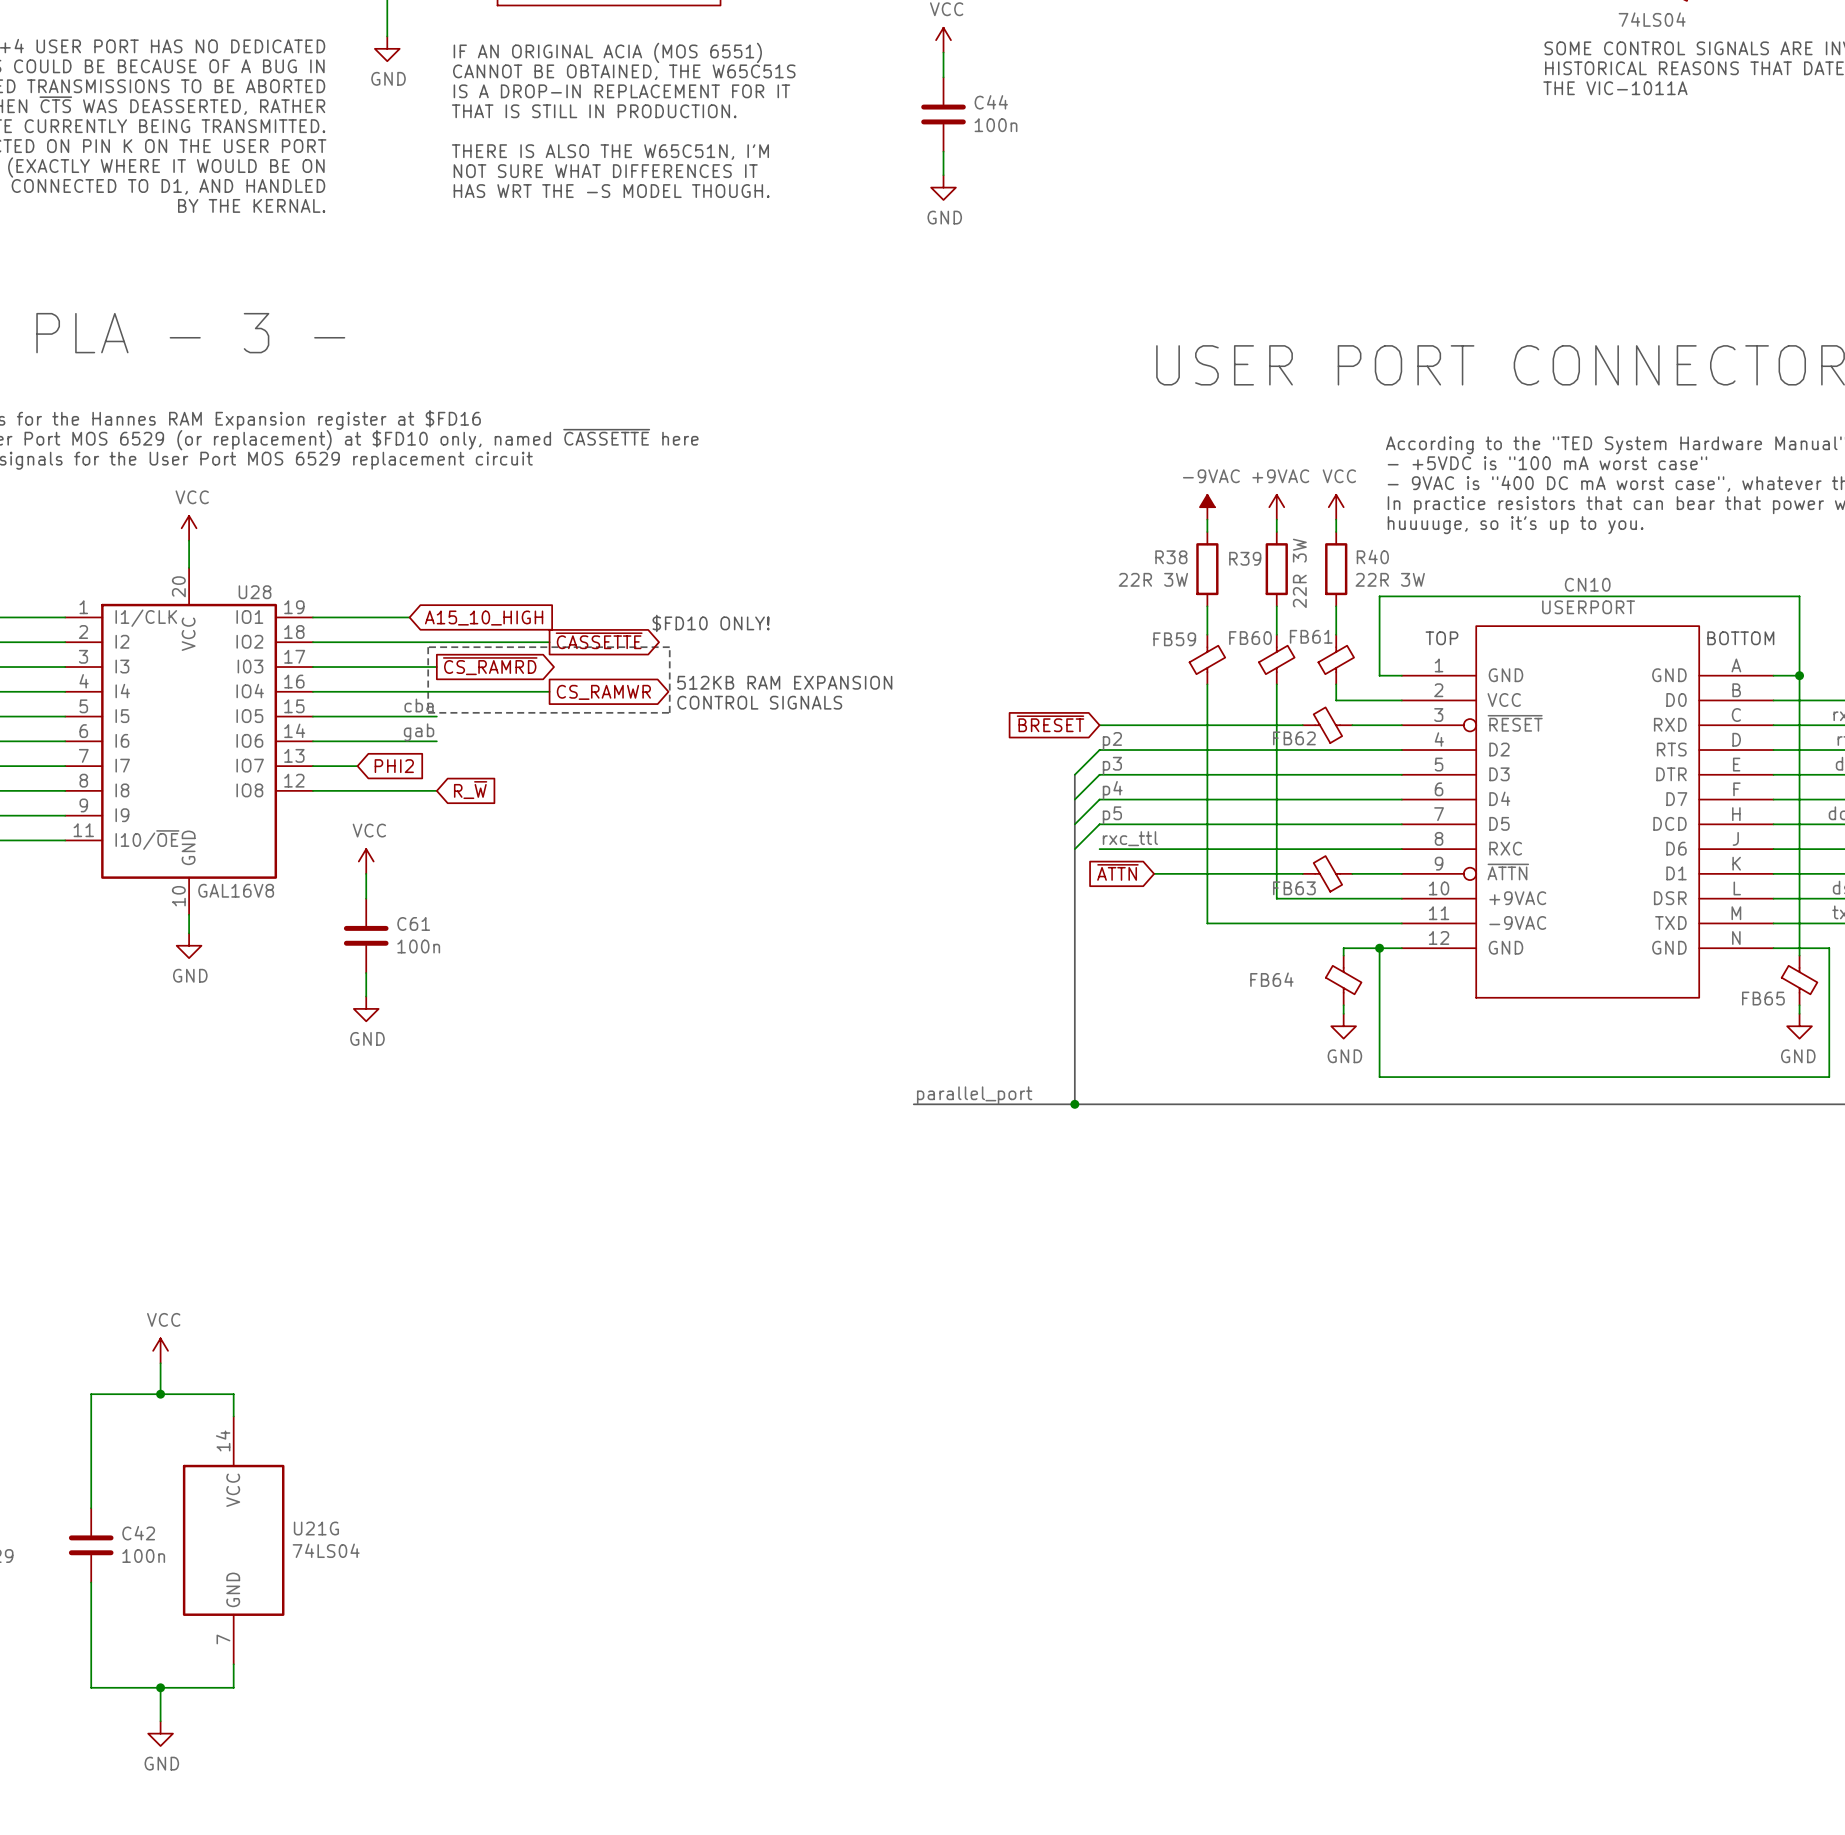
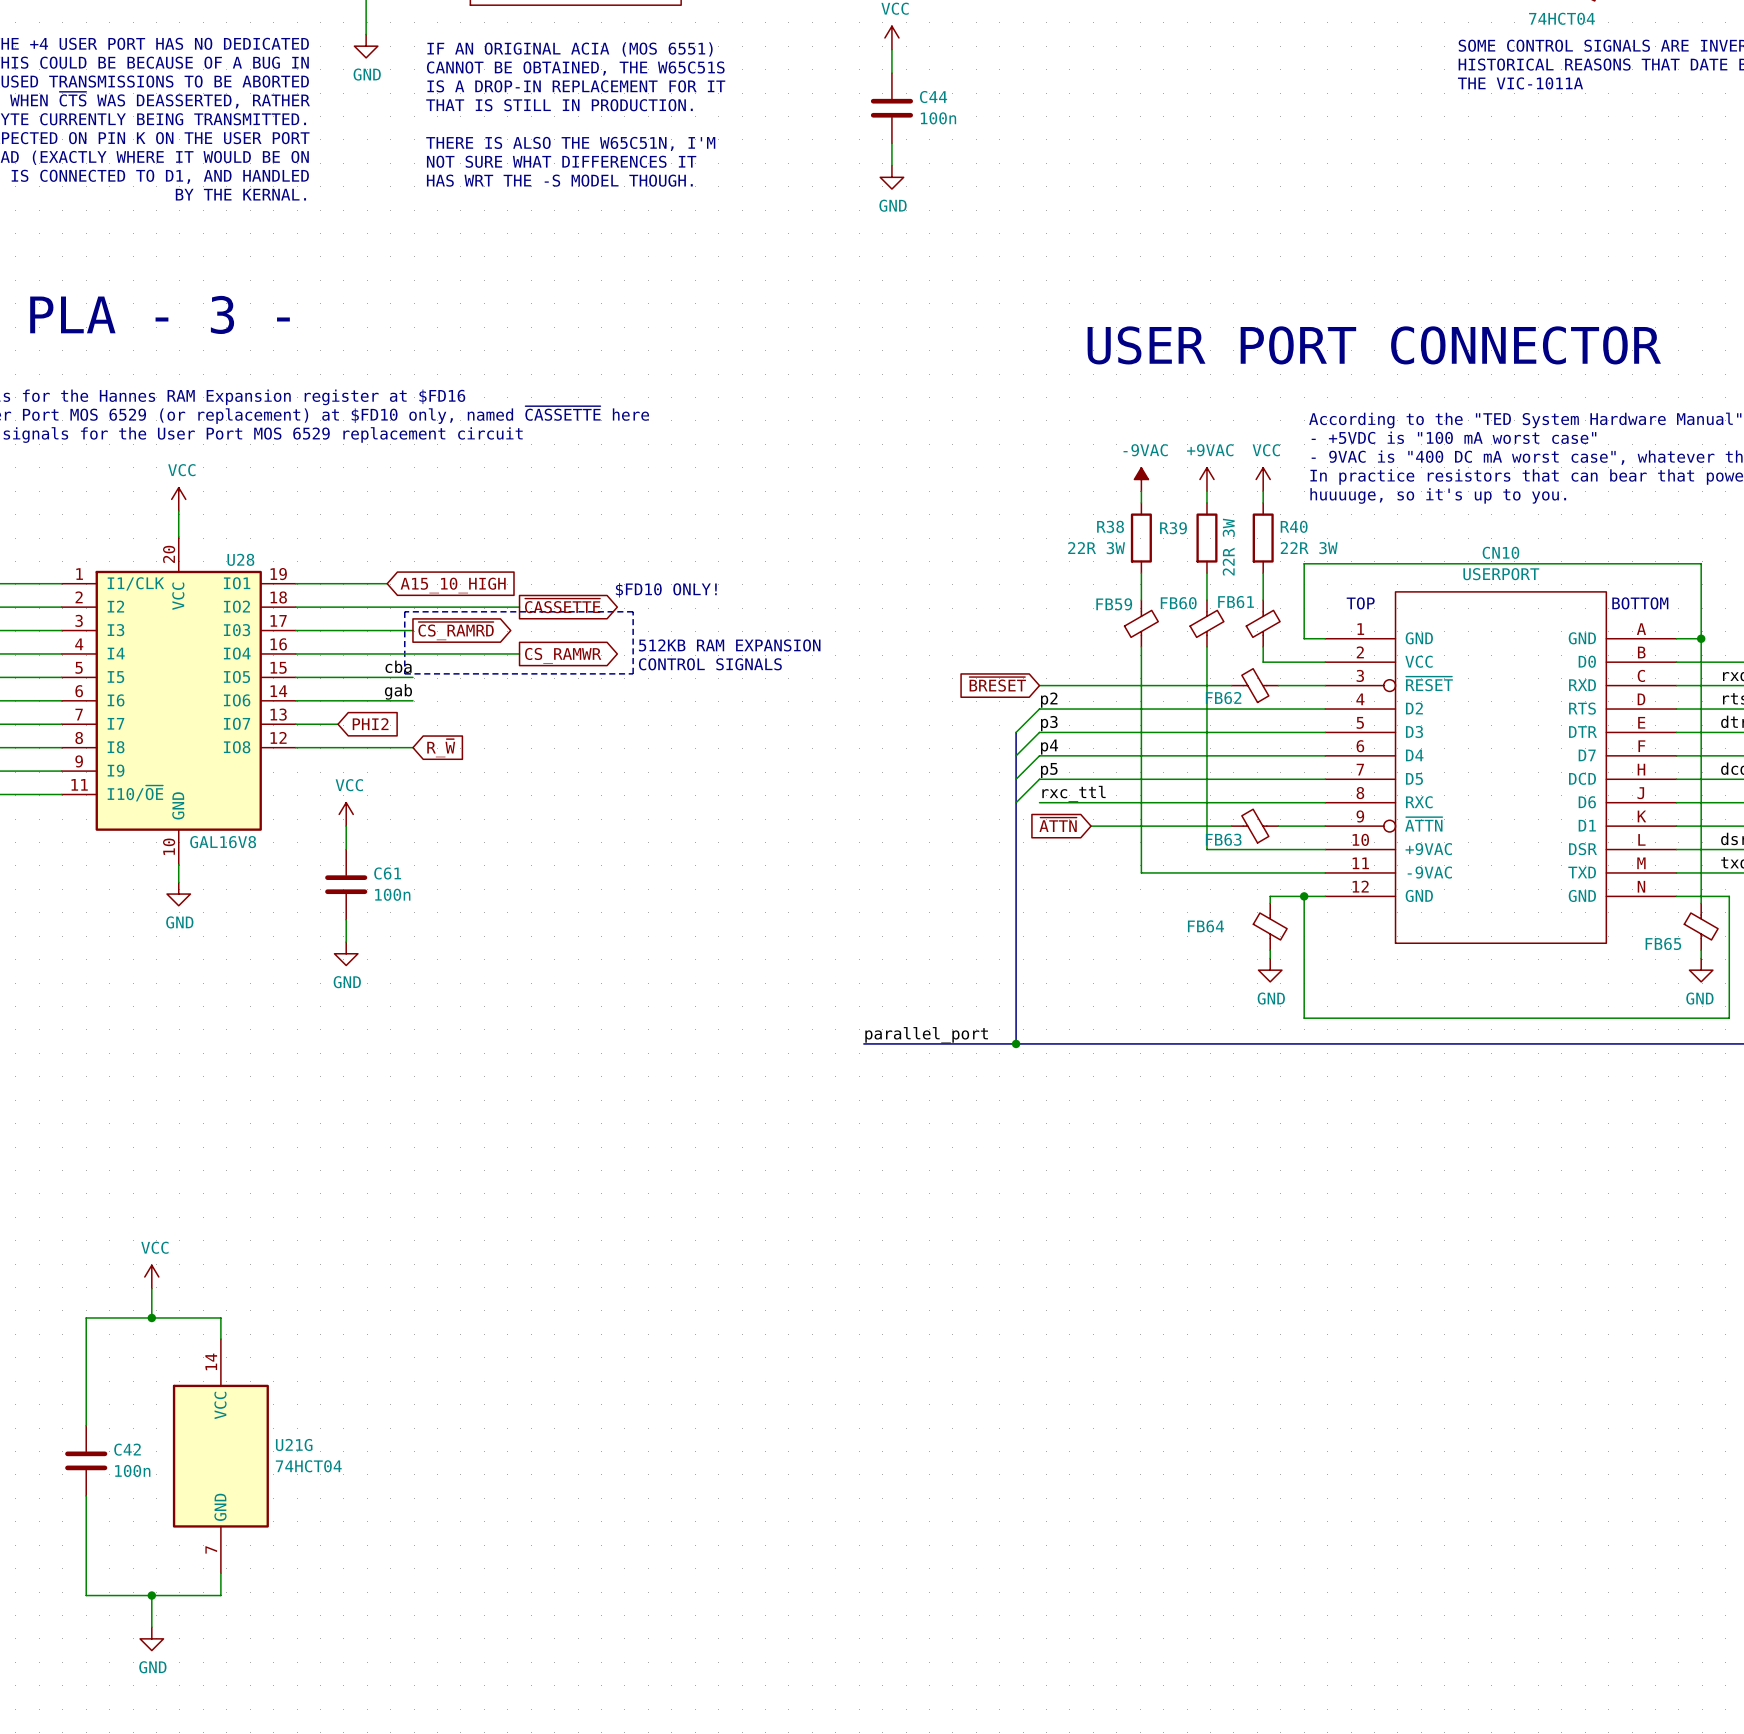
part value: 74LS04 (1652, 19) -> 74HCT04 (1561, 18)
U21G value: 74LS04 (326, 1550) -> 74HCT04 (308, 1466)

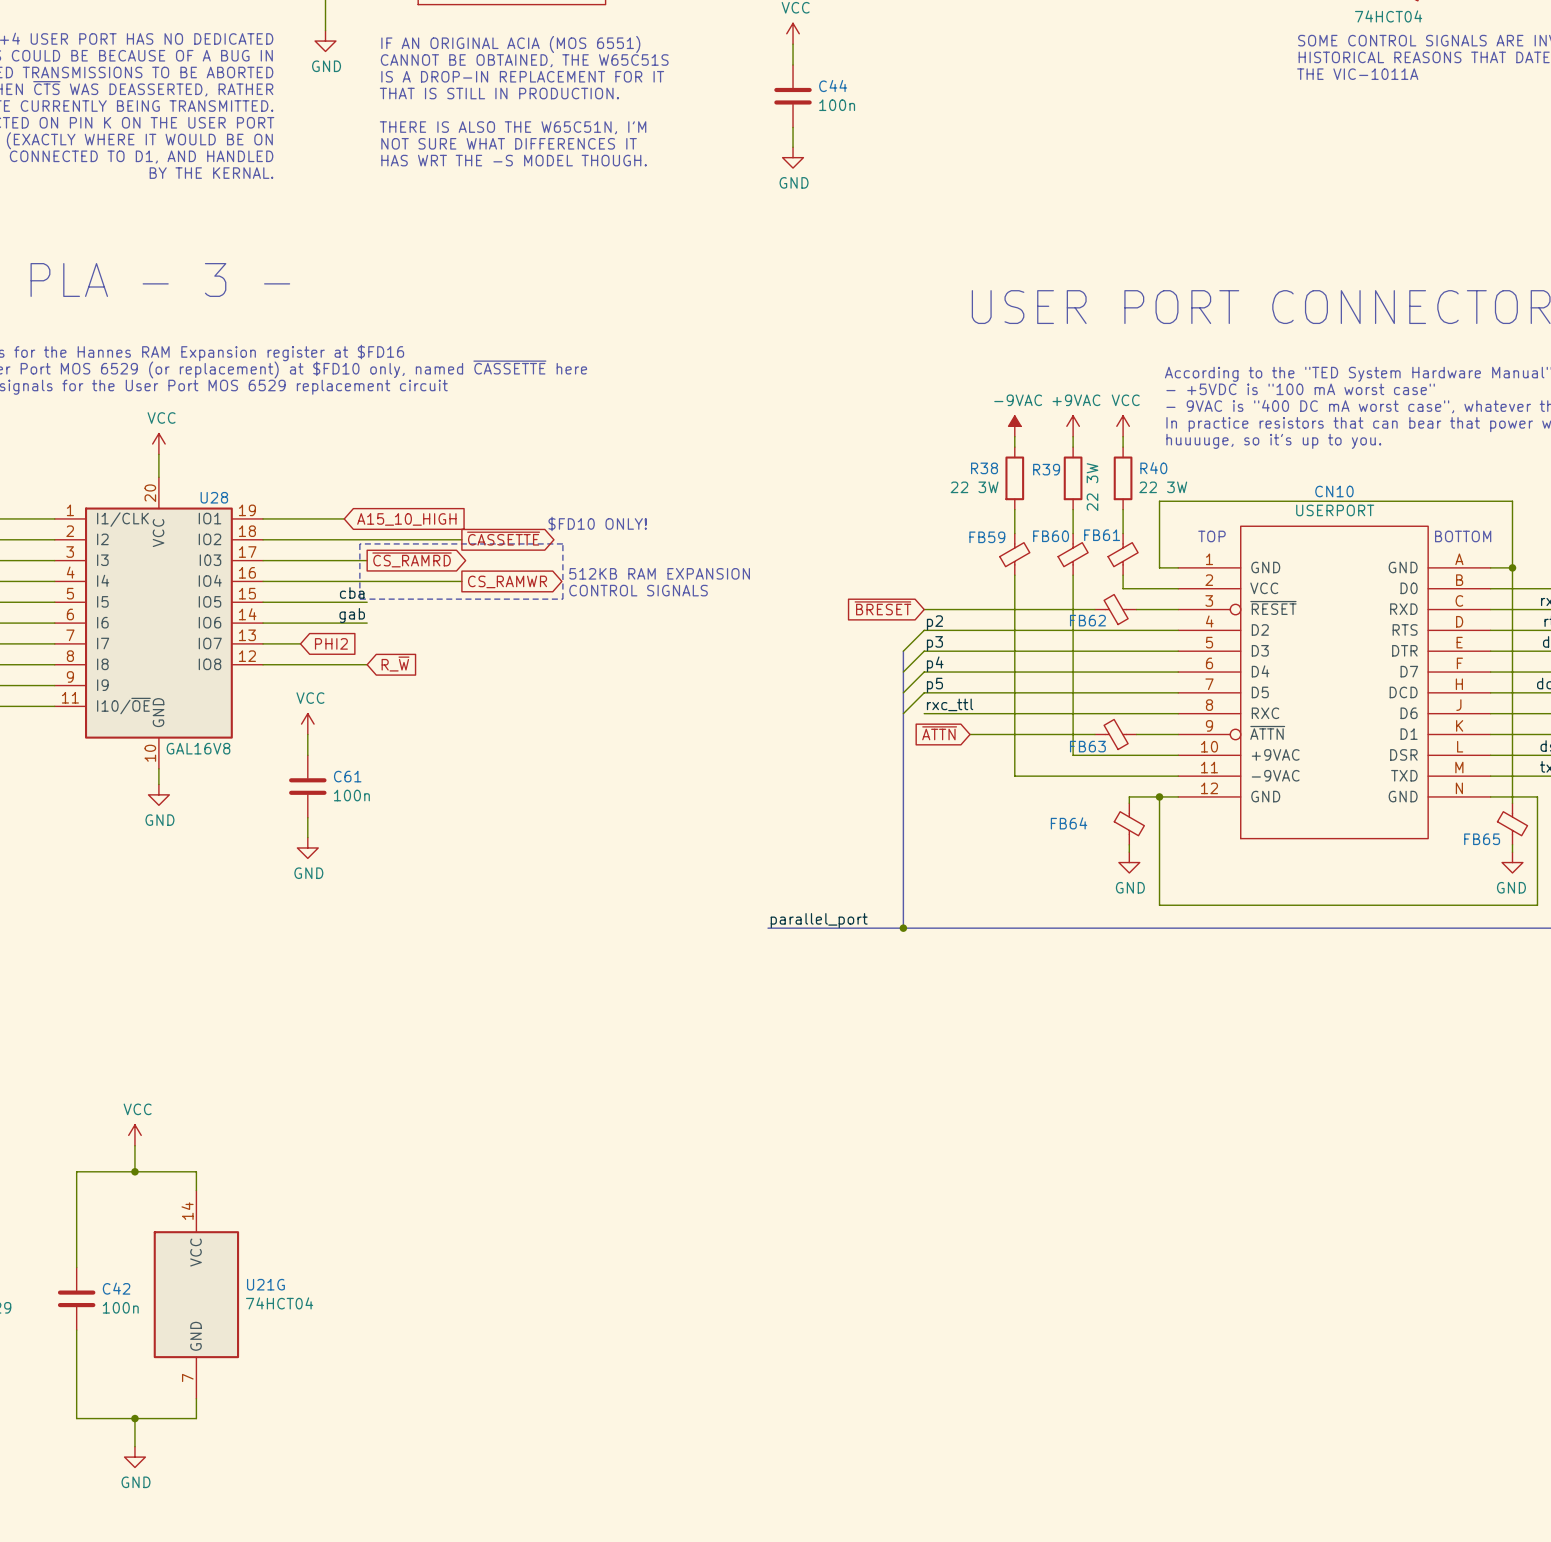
R39 value: 22R 3W (1228, 547) -> 22 3W (1092, 487)
R38 value: 22R 3W (1096, 548) -> 22 3W (974, 487)
R40 value: 22R 3W (1309, 548) -> 22 3W (1163, 487)

